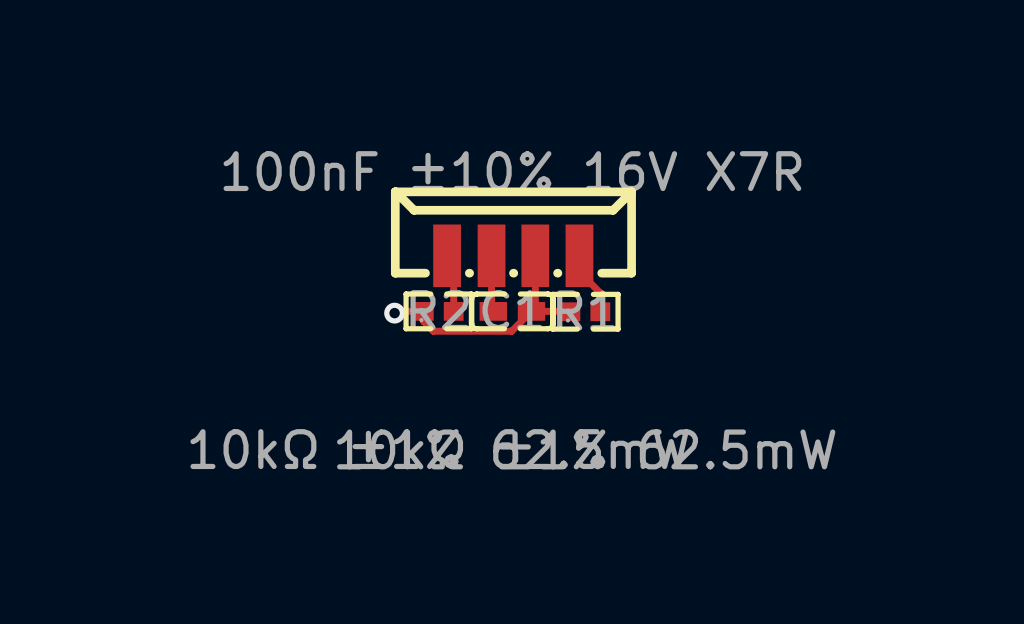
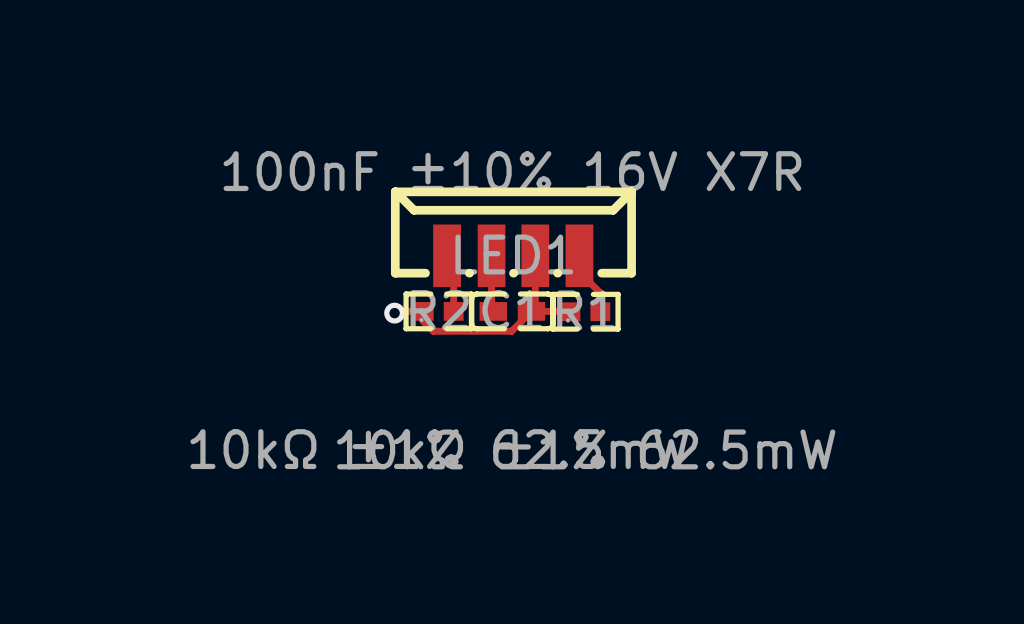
LED1 name: none -> LED1 (514, 254)

